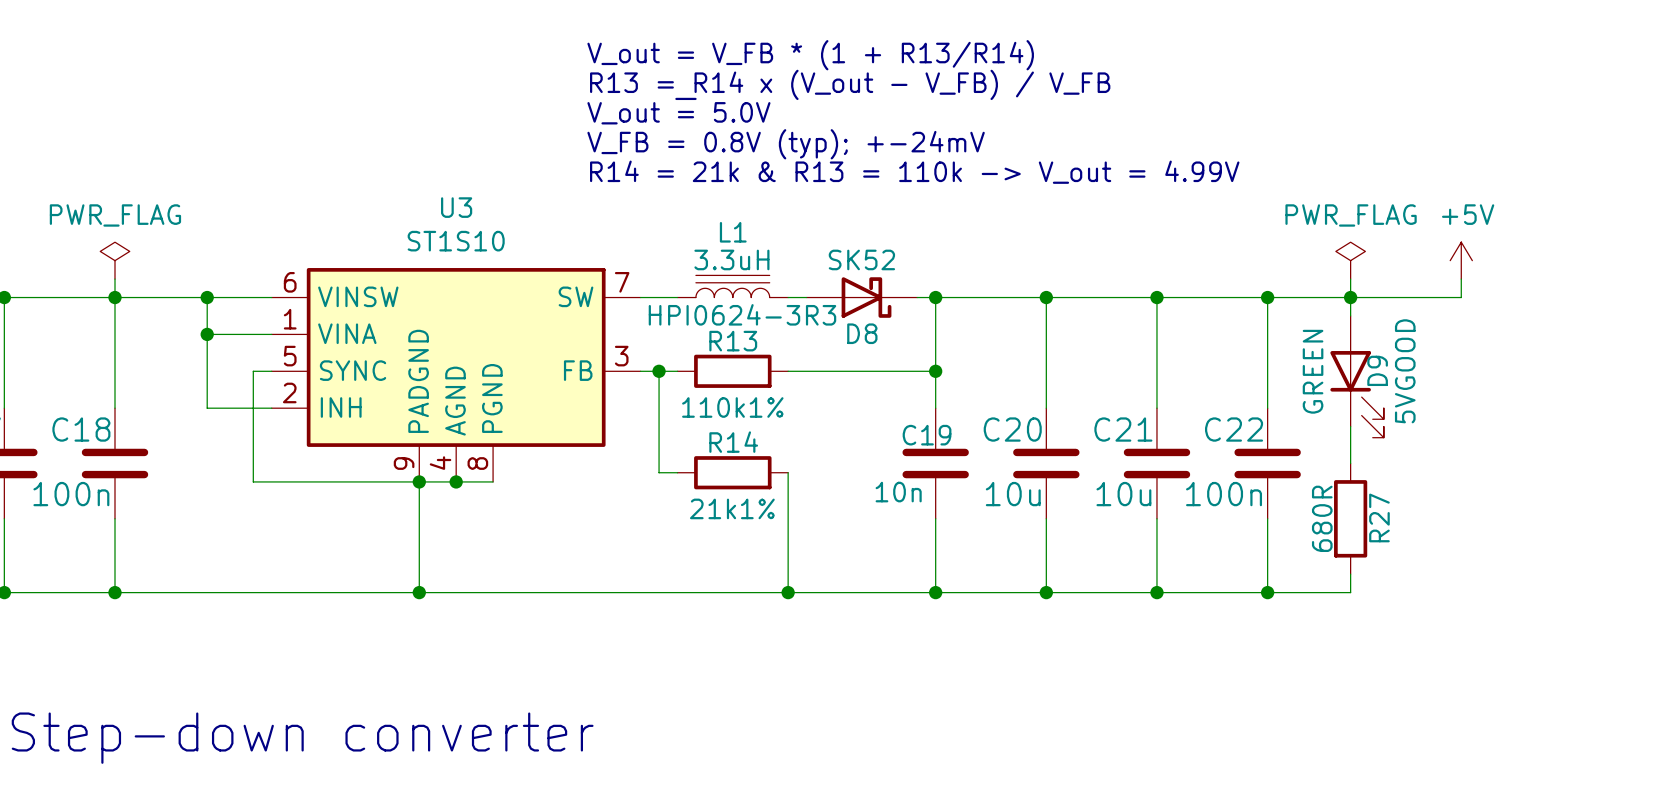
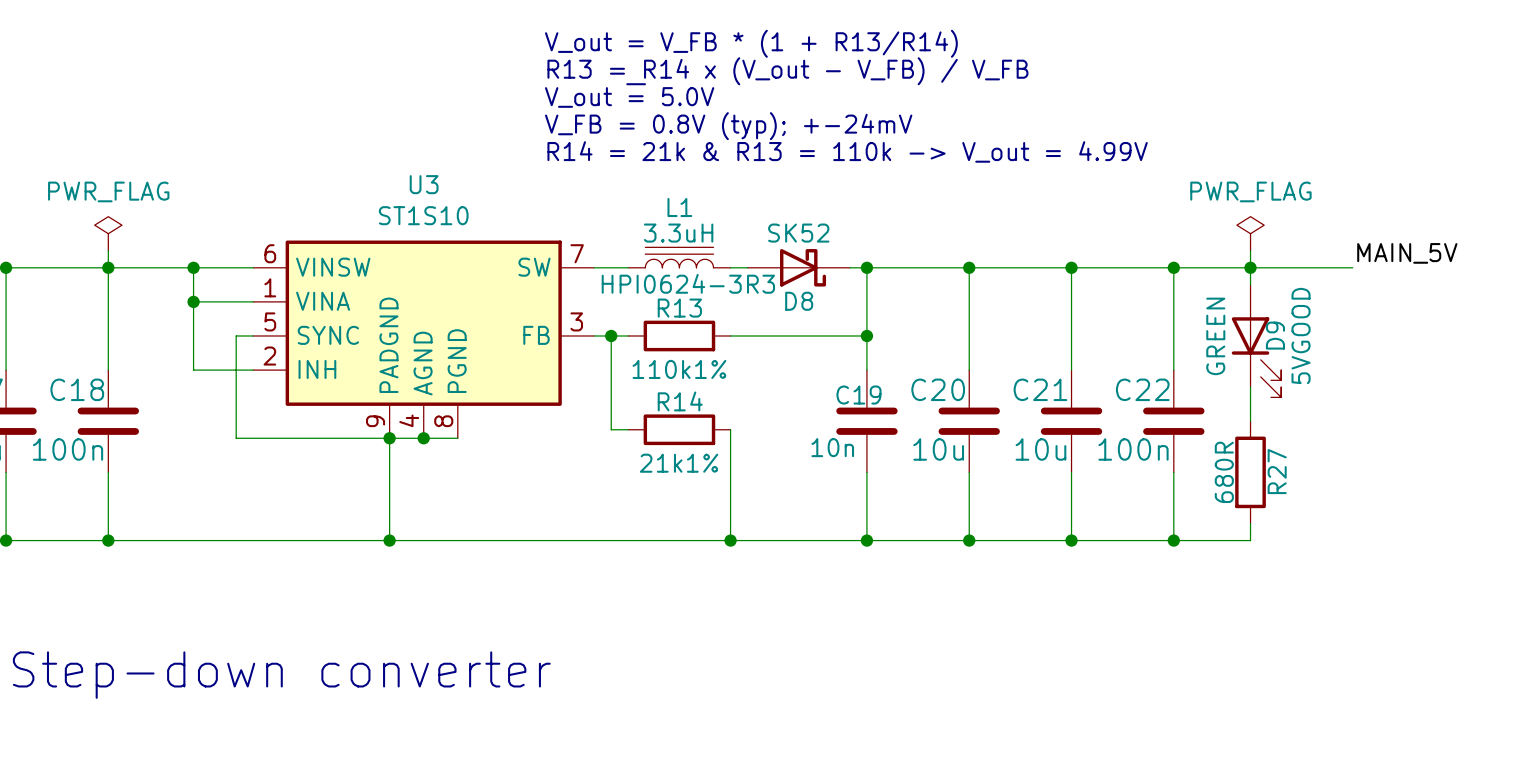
power symbol: +5V (1461, 260) -> none
wire: (1461, 279) (1461, 297) -> none
label: none -> MAIN_5V (1407, 253)

